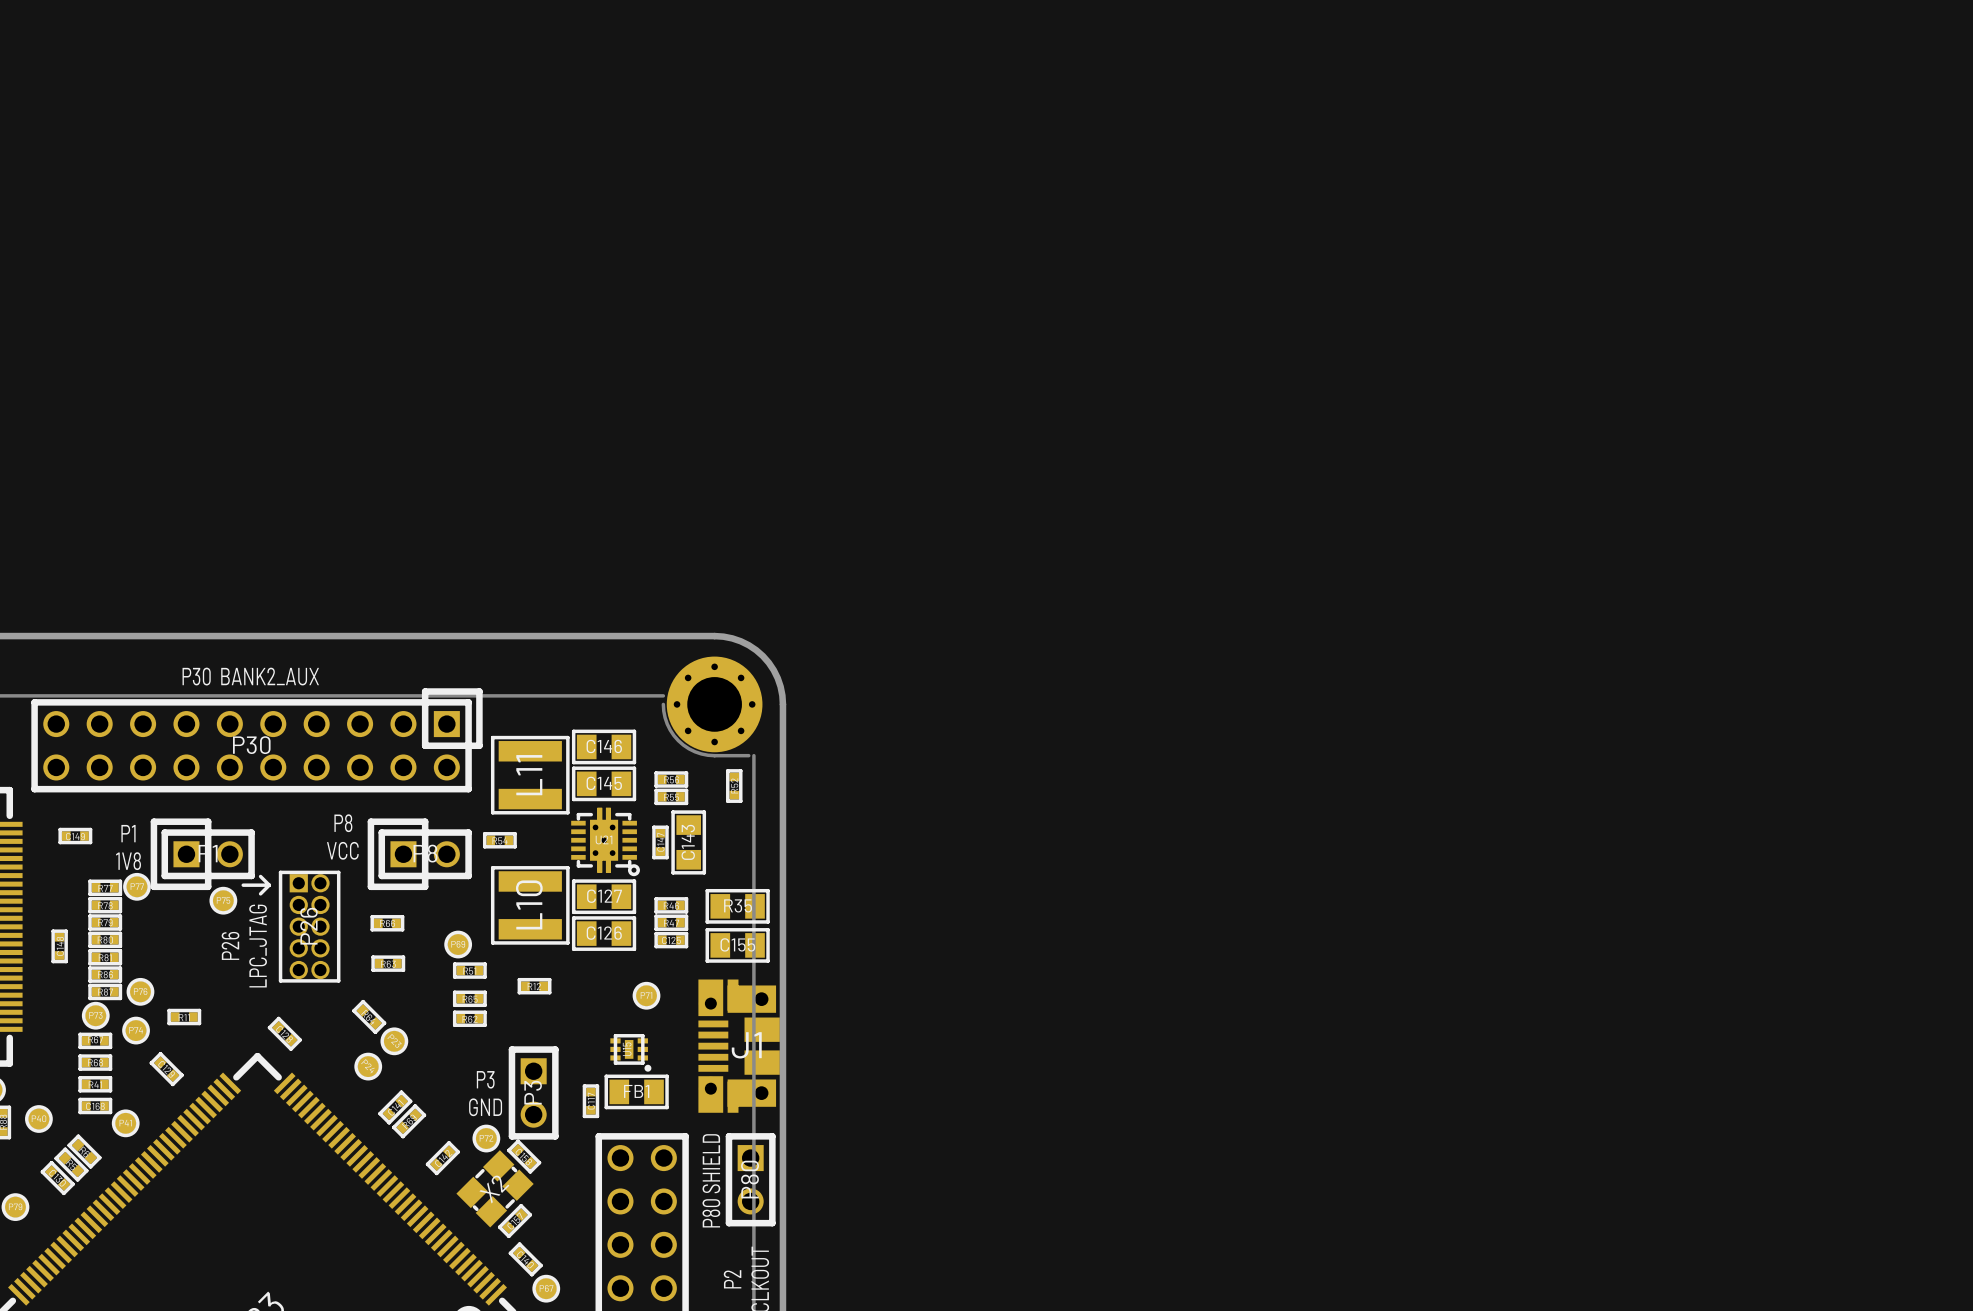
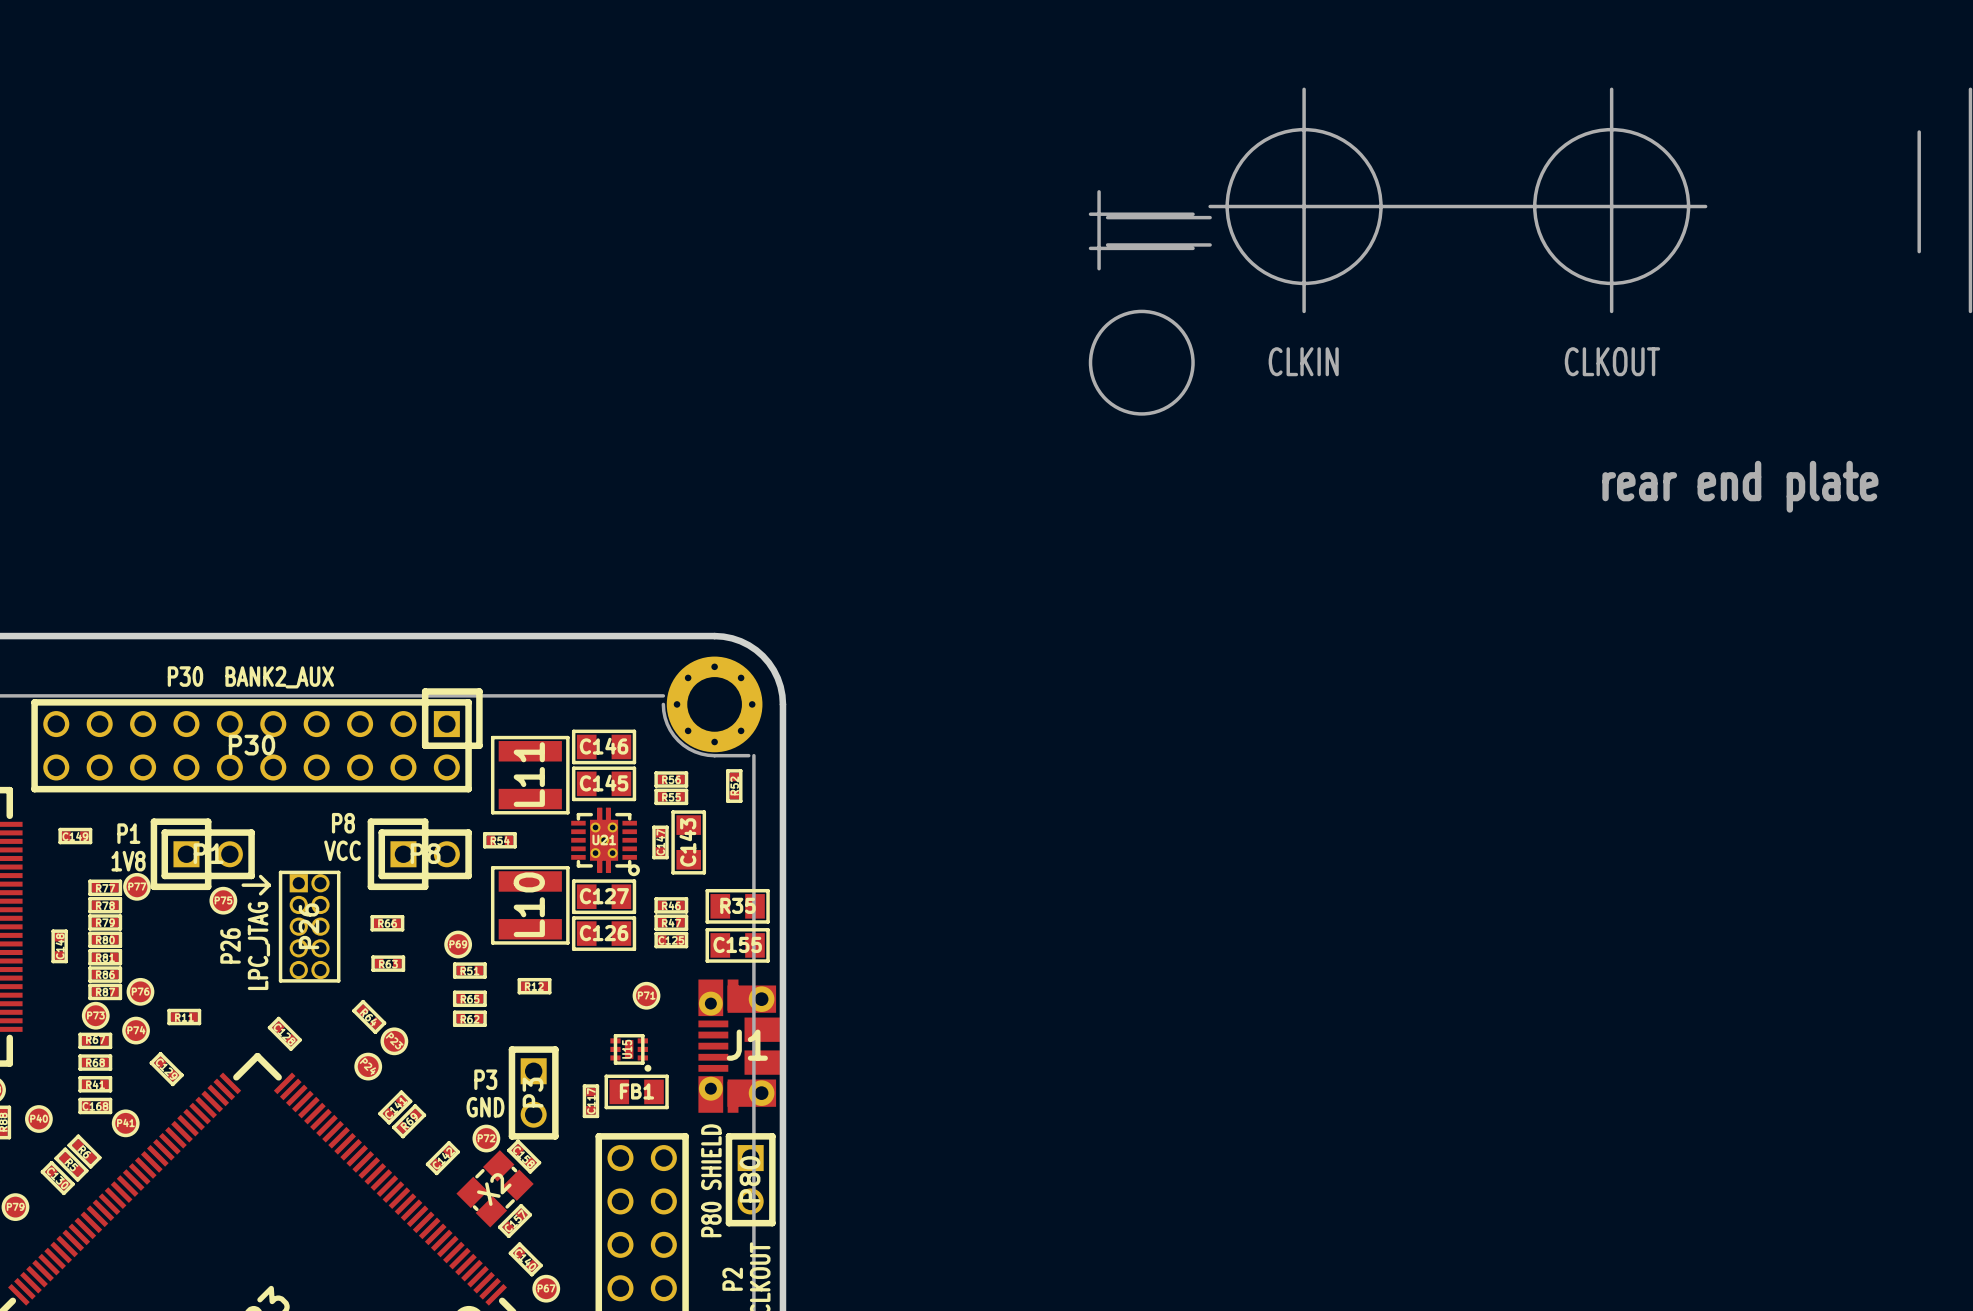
line: none -> (1304, 89) (1304, 311)
line: none -> (1611, 89) (1611, 311)
line: none -> (1970, 89) (1970, 311)
drawing: none -> [1225, 127, 1383, 286]
drawing: none -> [1533, 127, 1691, 286]
line: none -> (1919, 132) (1919, 251)
line: none -> (1099, 191) (1099, 268)
line: none -> (1210, 206) (1705, 206)
line: none -> (1090, 214) (1193, 214)
line: none -> (1107, 217) (1210, 217)
line: none -> (1107, 244) (1210, 244)
line: none -> (1090, 248) (1193, 248)
drawing: none -> [1088, 309, 1195, 416]
text: none -> CLKIN (1303, 361)
text: none -> CLKOUT (1612, 361)
text: none -> rear end plate (1740, 486)

